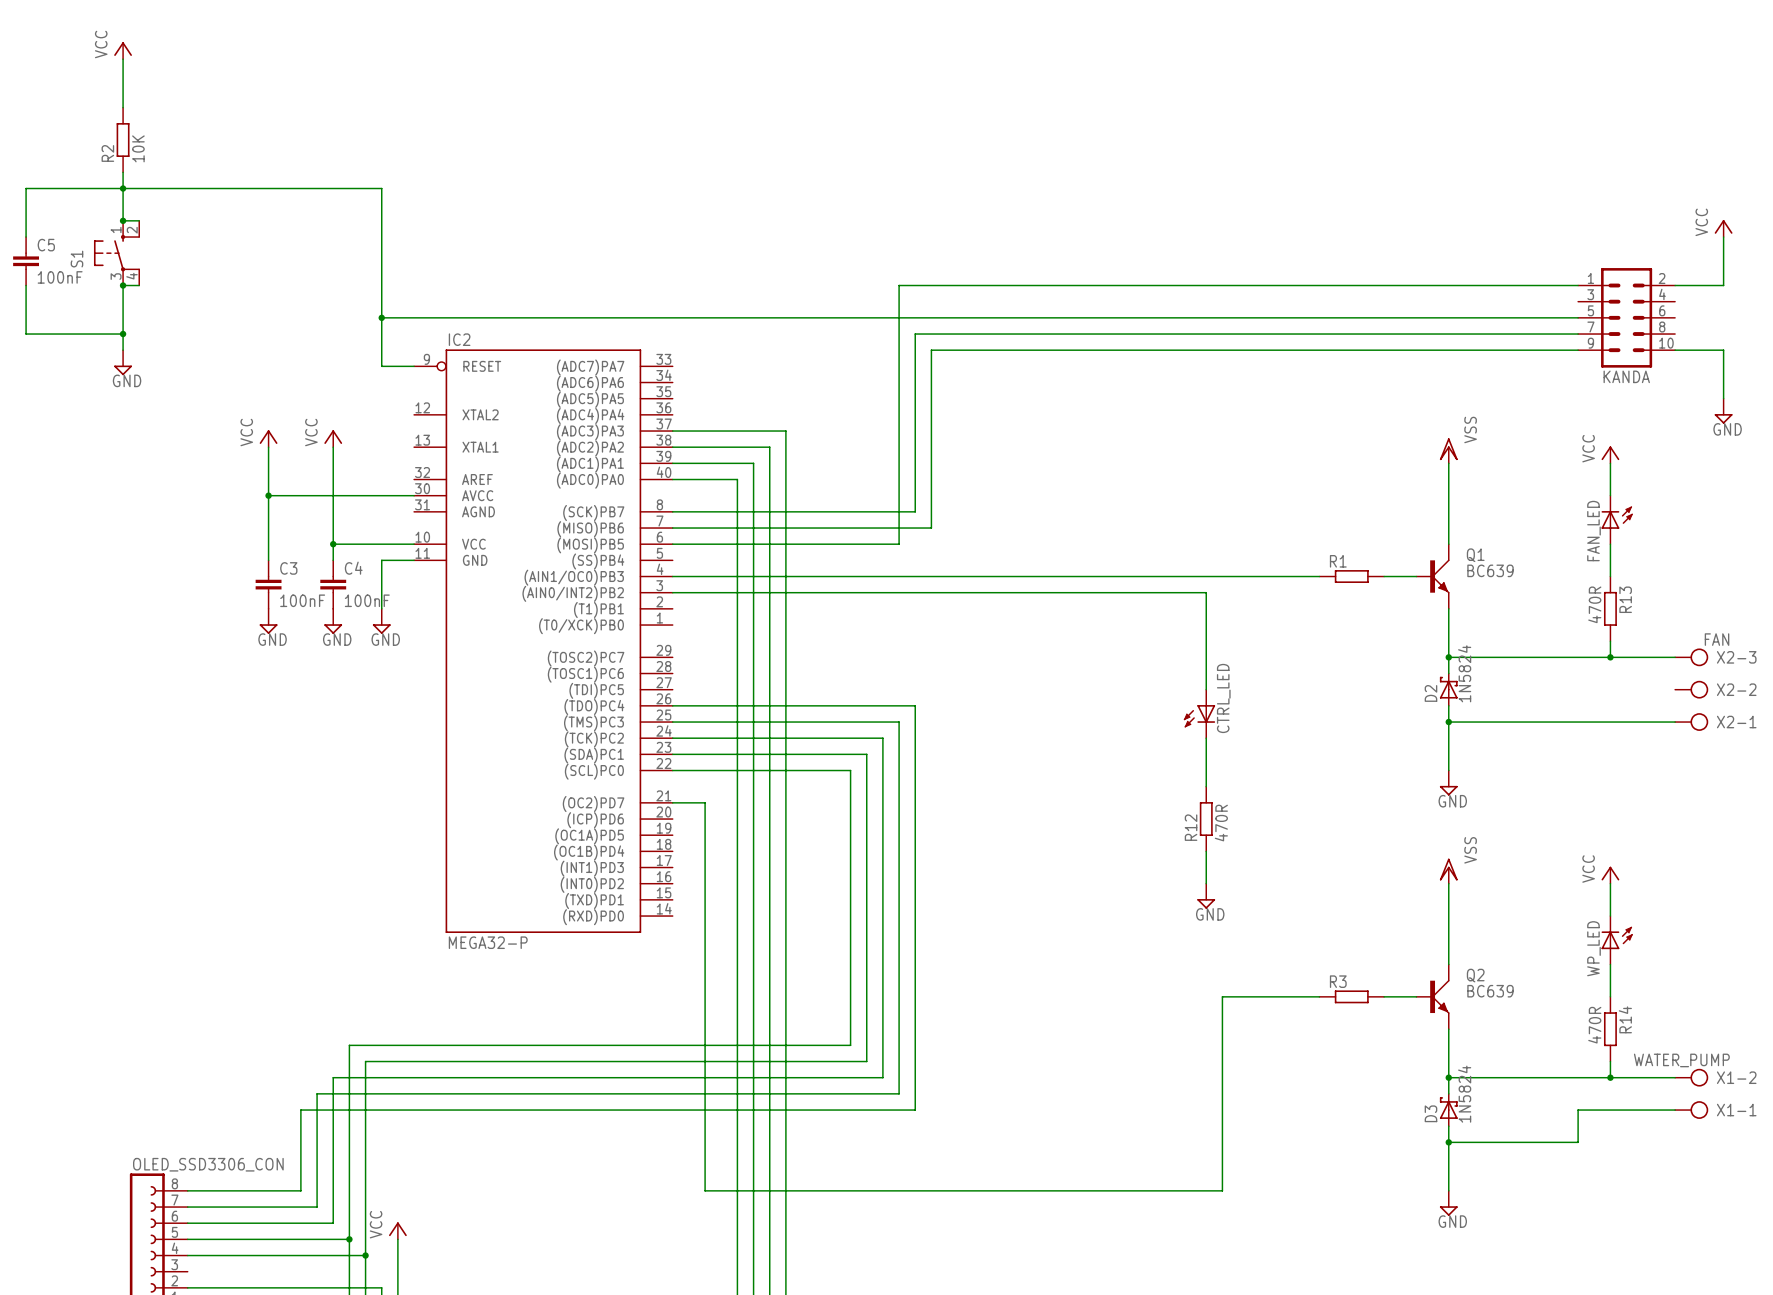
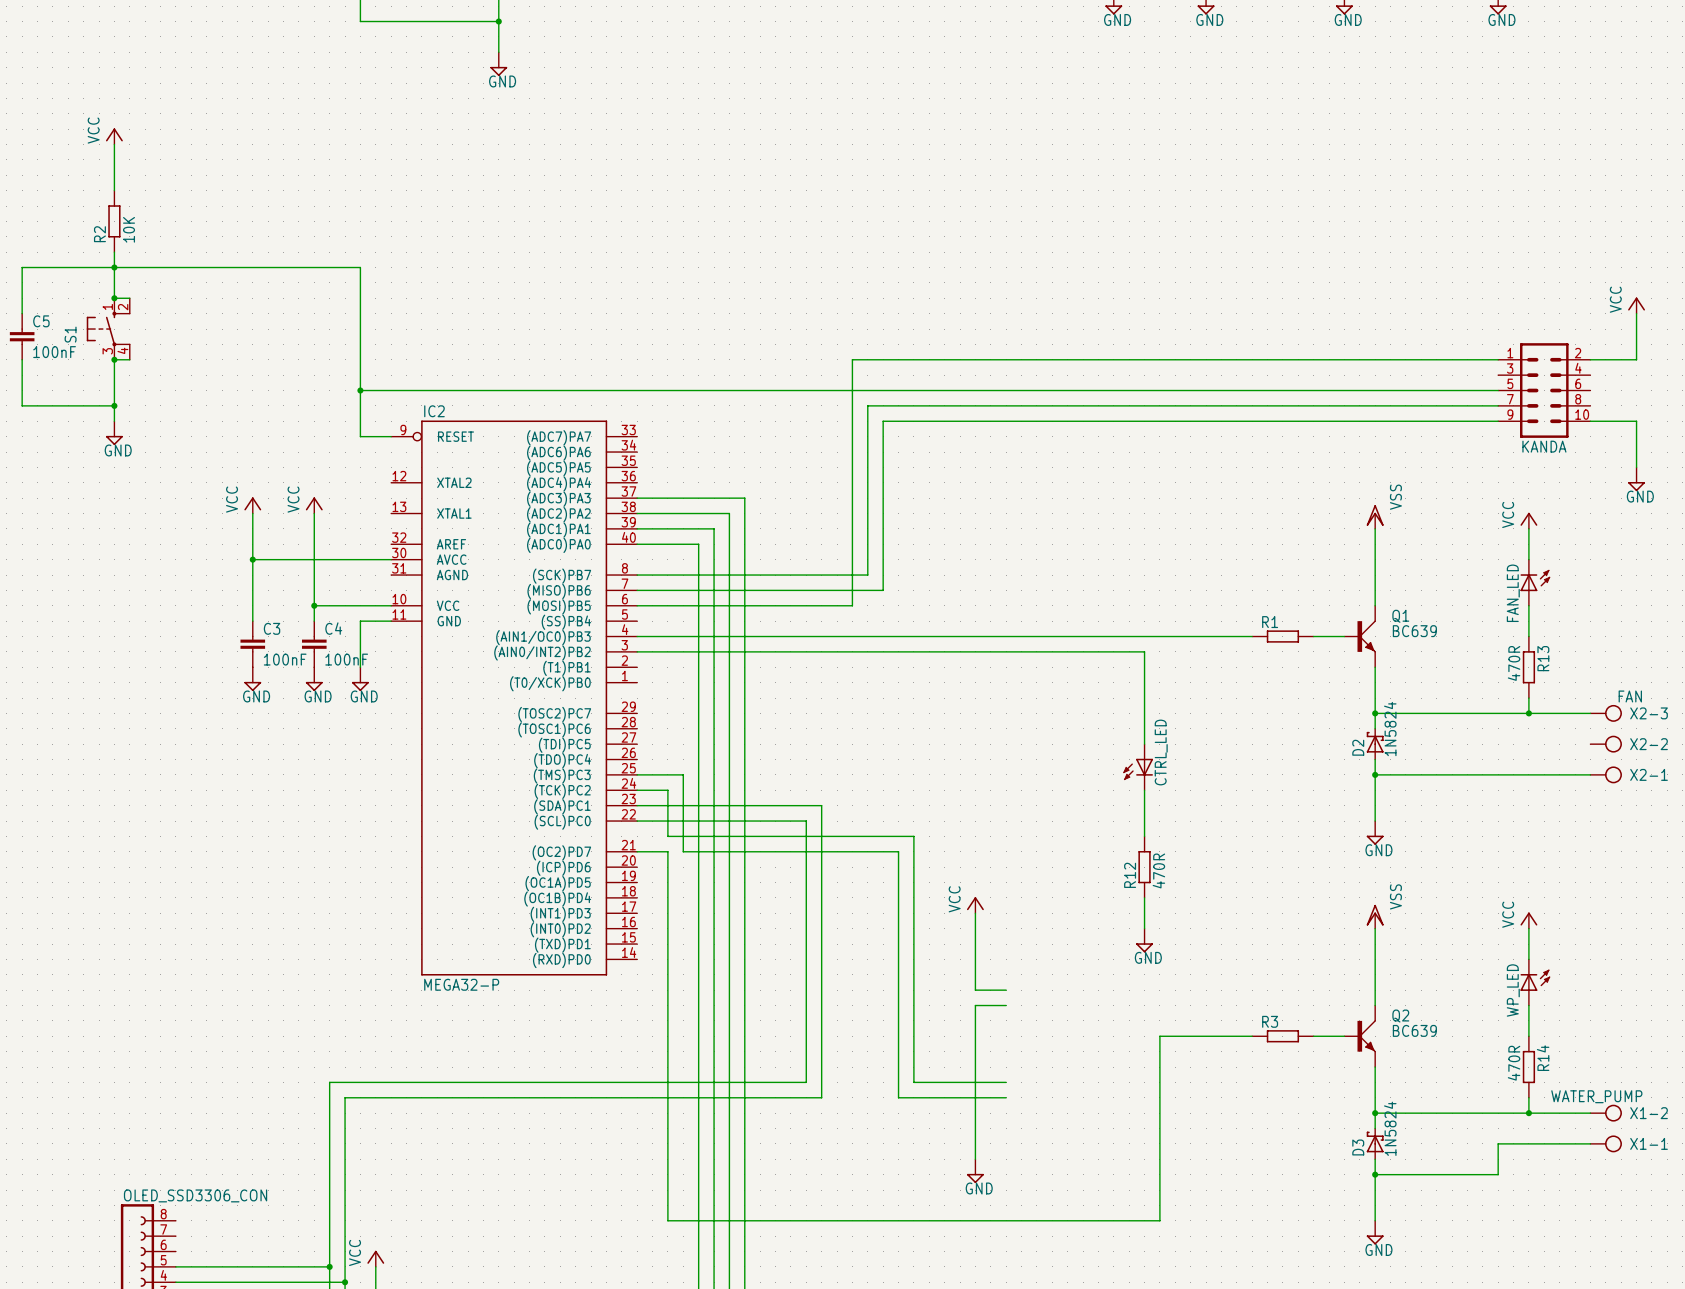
wire: (672, 705) (915, 705) (915, 1110) (300, 1110) (300, 1190) (187, 1190) -> none
wire: (721, 722) (899, 722) (899, 1093) (317, 1093) (317, 1207) (187, 1207) -> (683, 774) (683, 851) (898, 851) (898, 1097) (1006, 1097)
wire: (705, 738) (882, 738) (882, 1077) (333, 1077) (333, 1223) (187, 1223) -> (667, 790) (667, 836) (913, 836) (913, 1082) (1006, 1082)
power symbol: none -> VCC (975, 905)
wire: none -> (975, 913) (975, 990) (1006, 990)
wire: none -> (1006, 1005) (975, 1005) (975, 1159)
power symbol: none -> GND (975, 1171)

